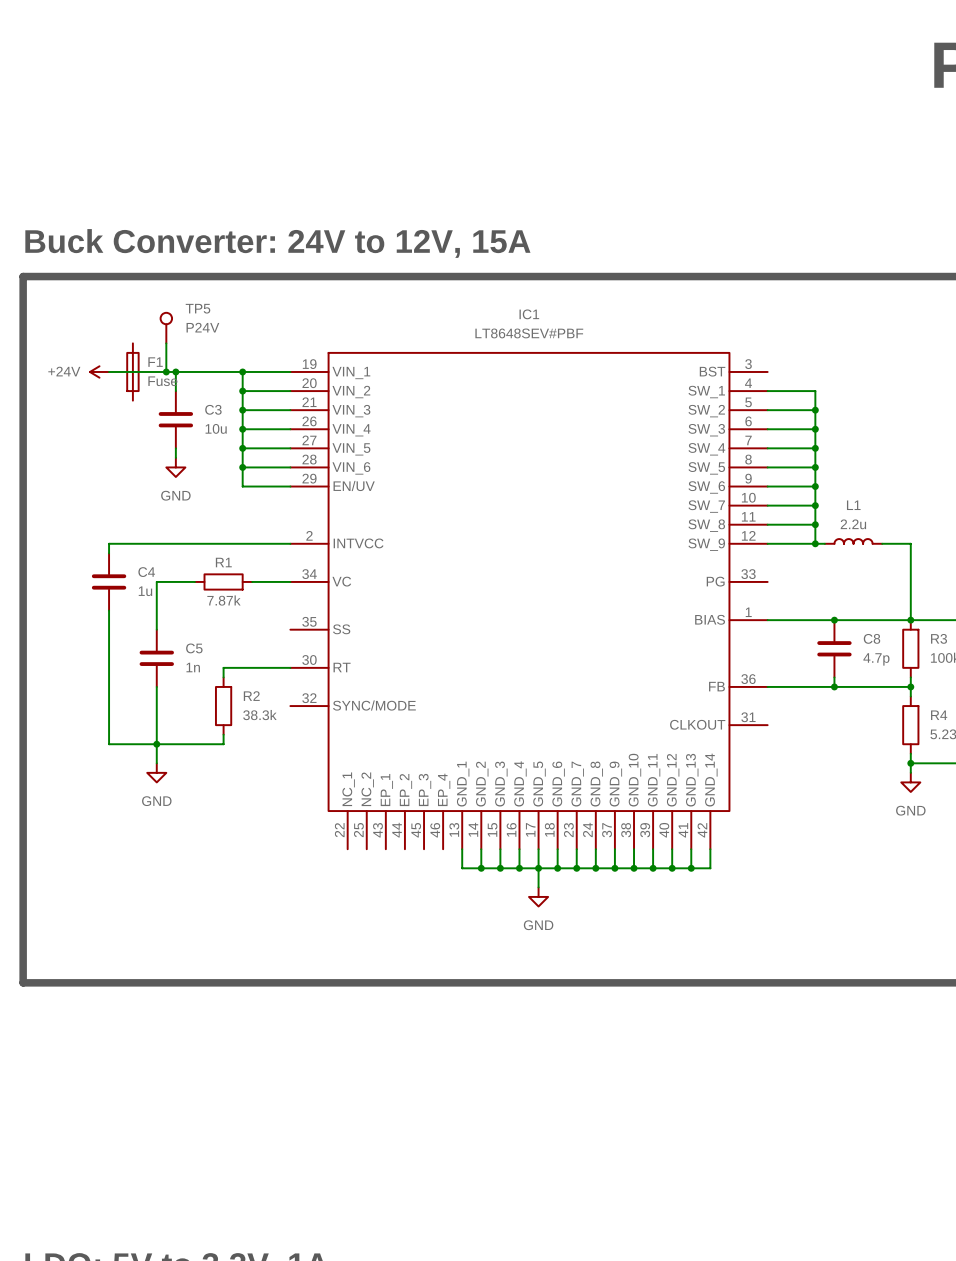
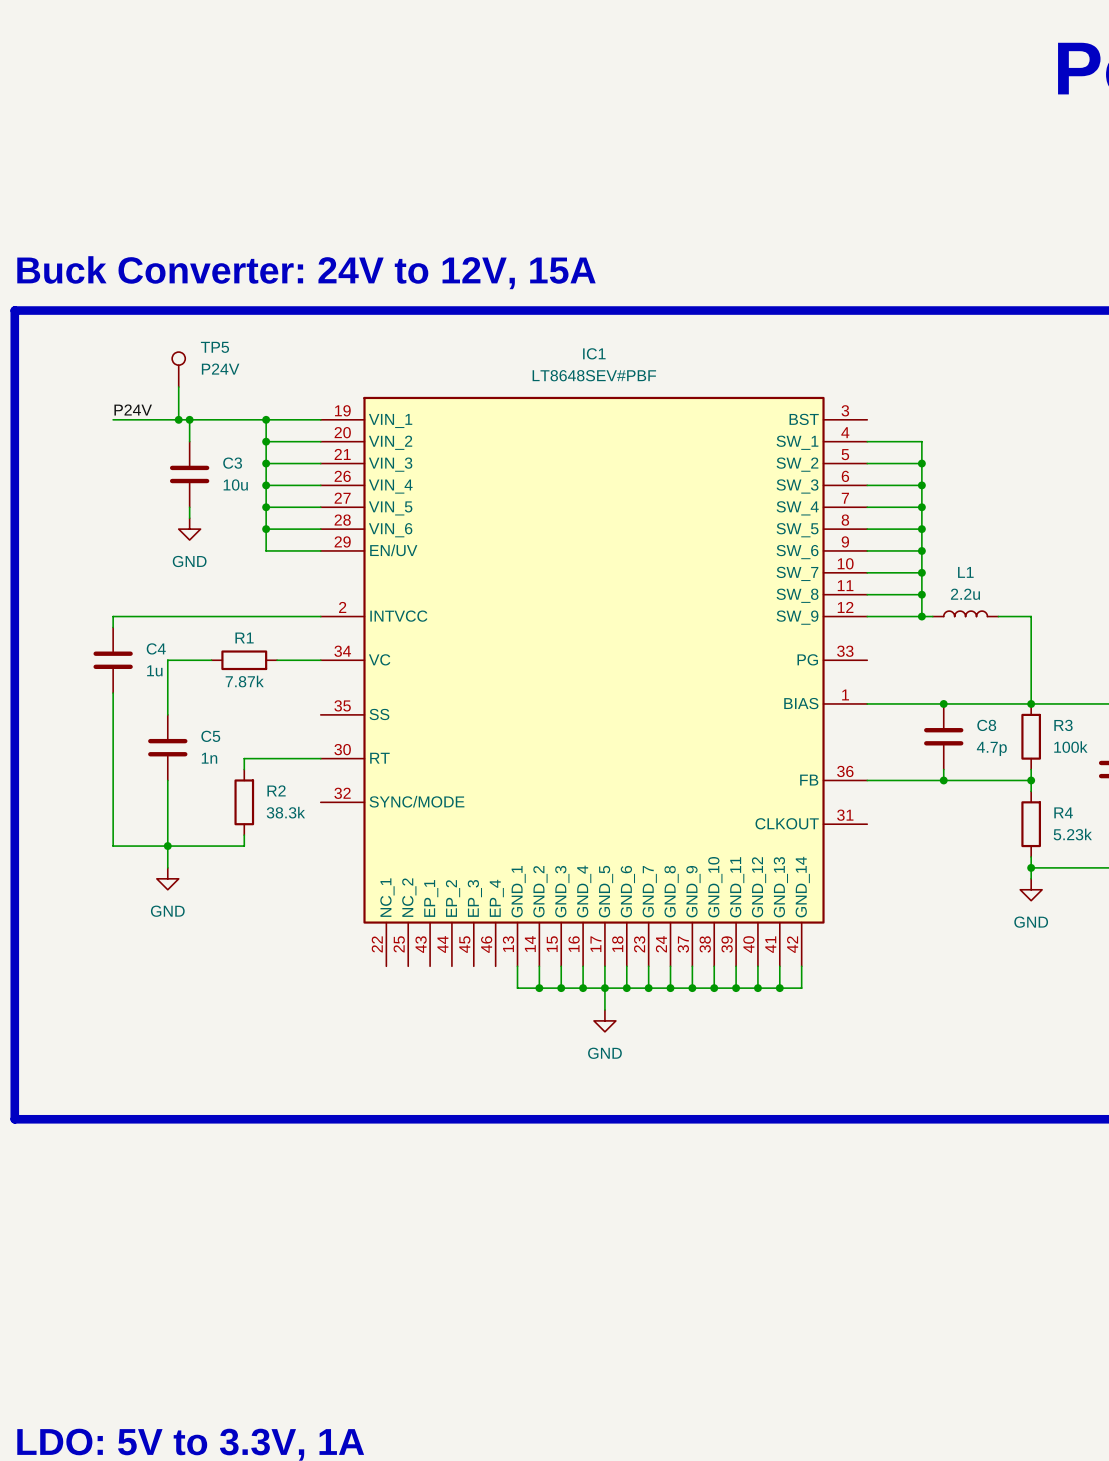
label: none -> P24V (133, 409)
power symbol: +24V (99, 371) -> none
F1: Fuse (132, 371) -> none

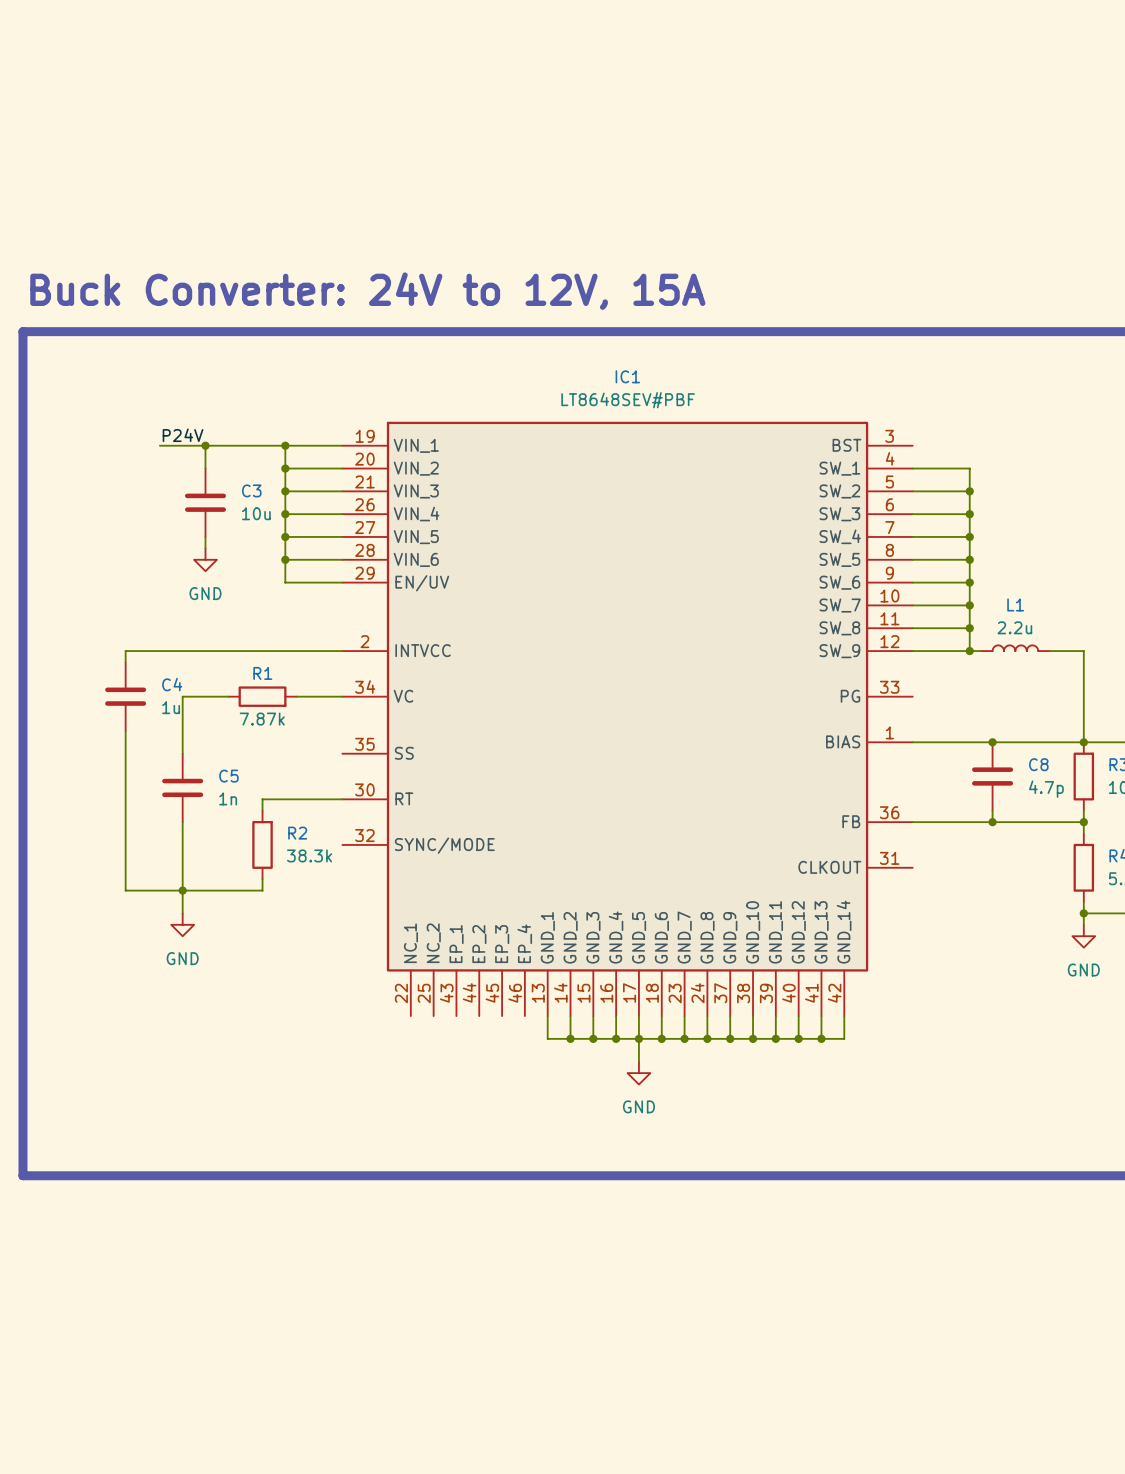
TP5: P24V (178, 369) -> none
wire: (178, 387) (178, 419) -> none
label position: P24V (133, 409) -> P24V (183, 435)
wire: (113, 419) (145, 419) -> none
junction: (178, 419) -> none

